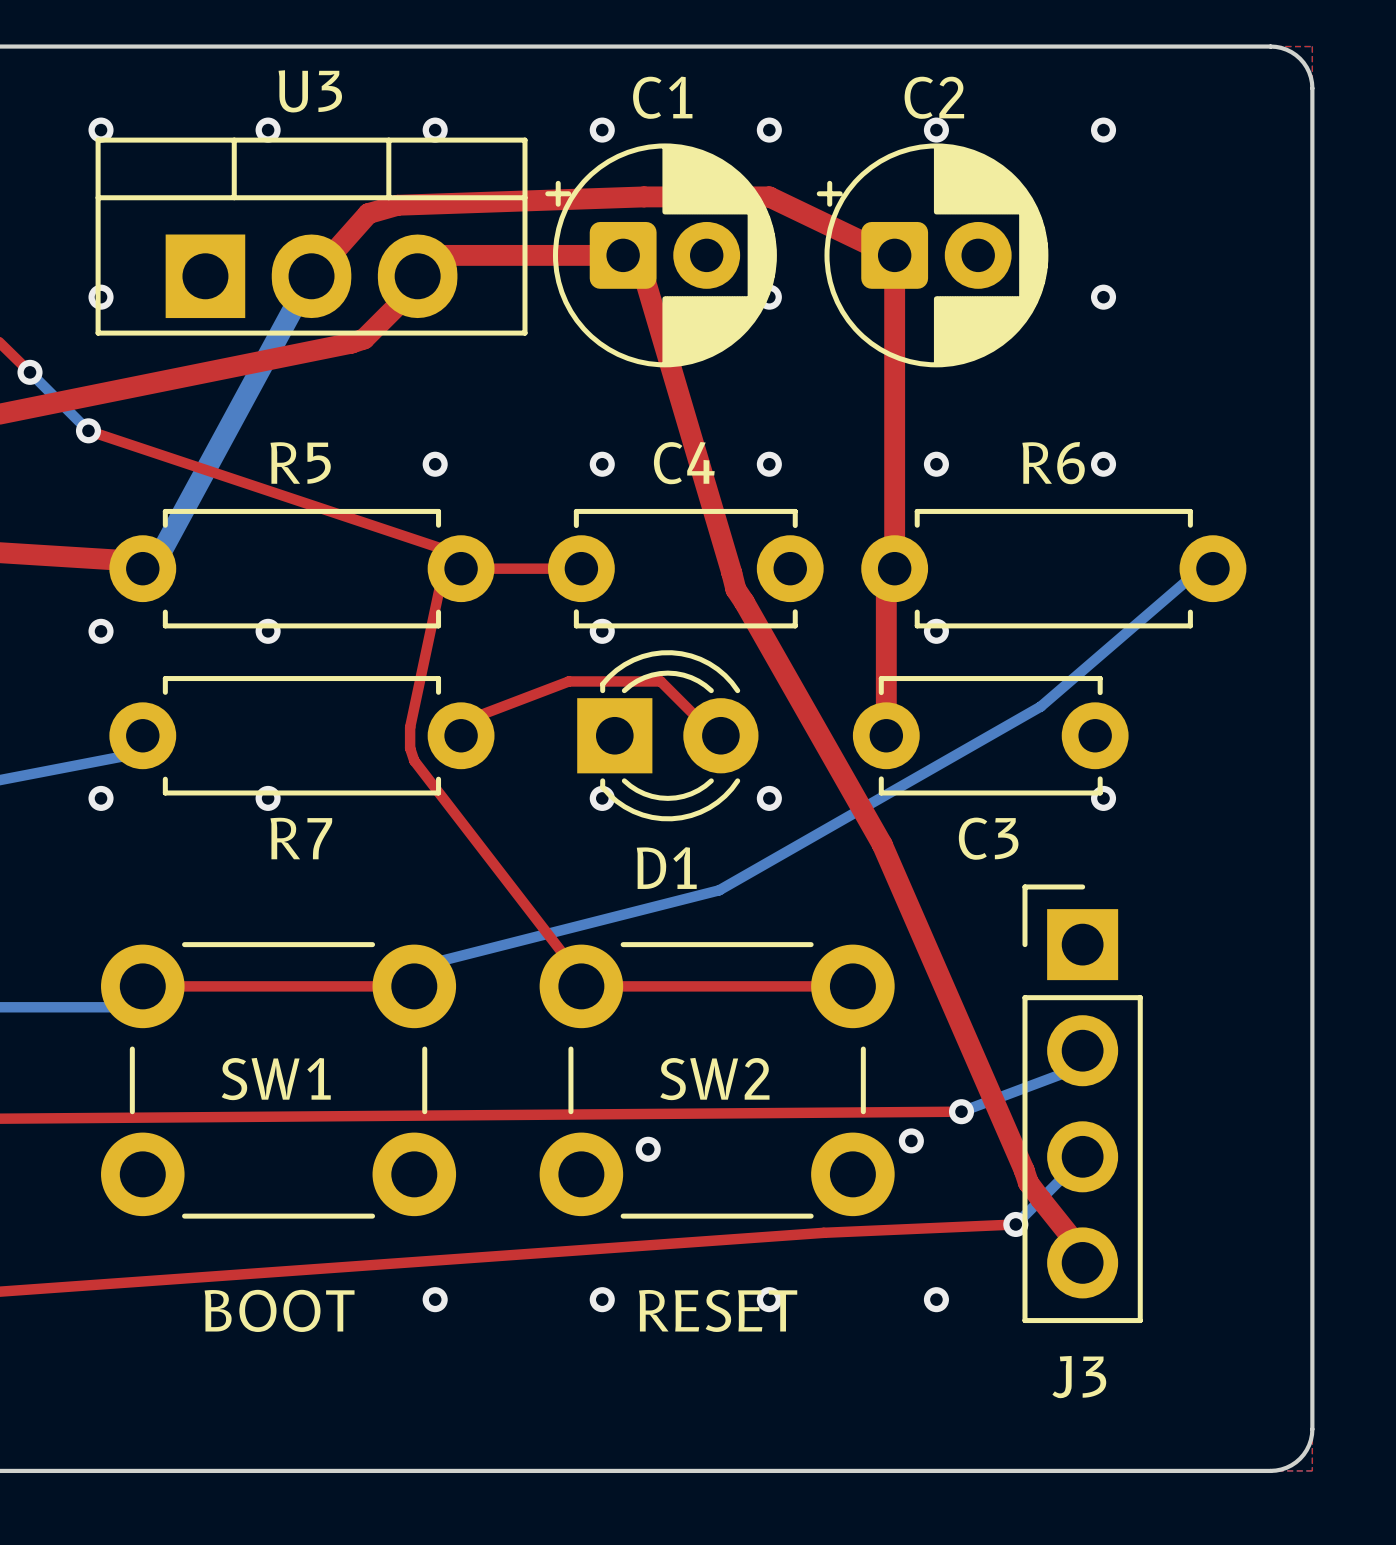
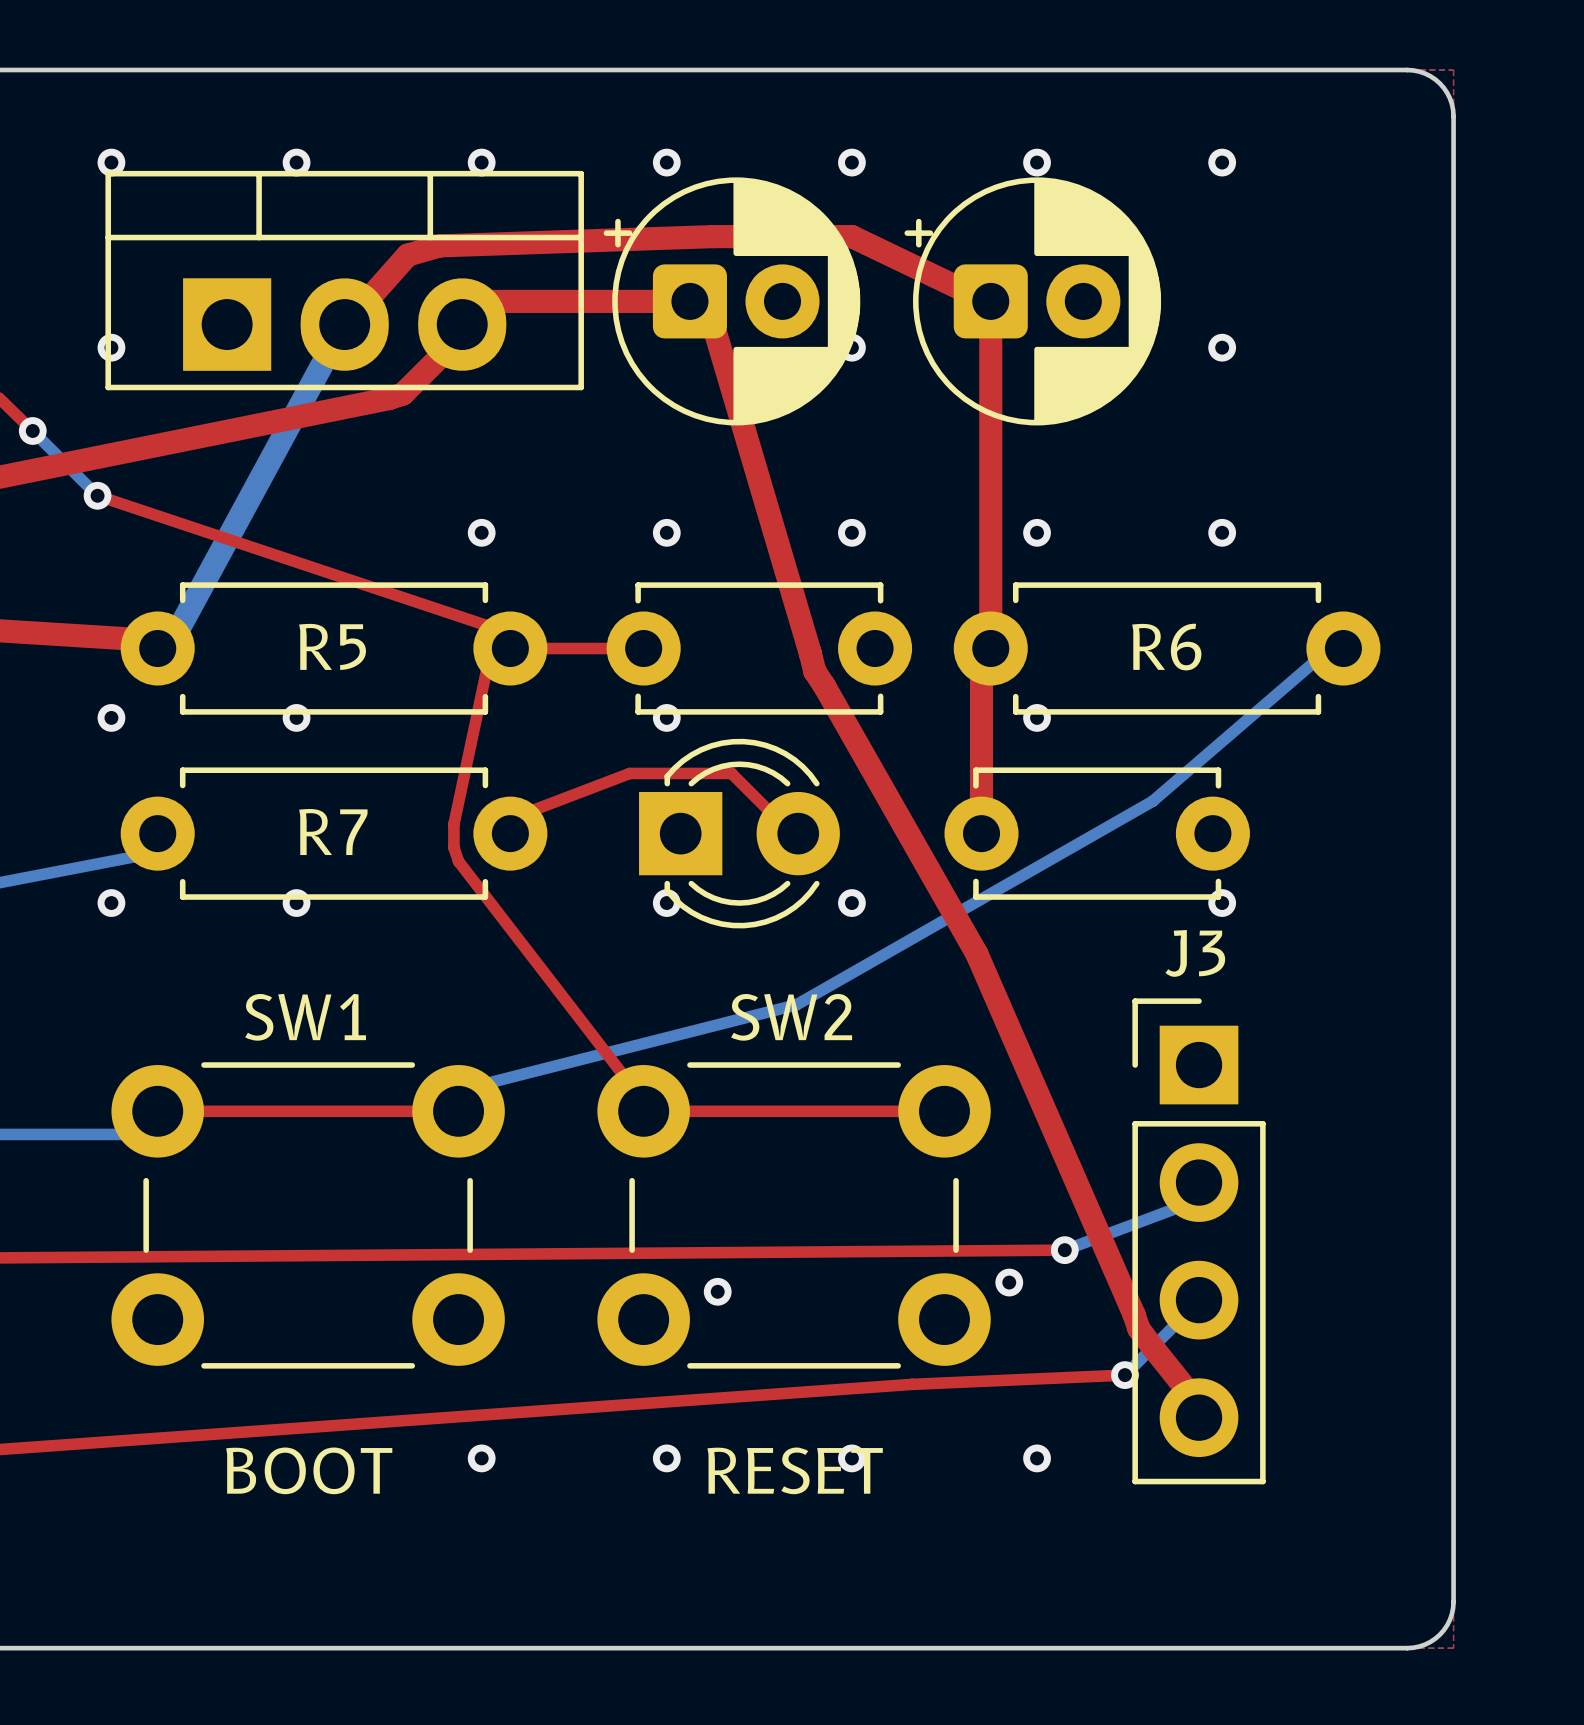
U3 name: U3 (310, 91) -> none
C1 name: C1 (662, 97) -> none
C2 name: C2 (934, 97) -> none
R5 name position: R5 (300, 463) -> R5 (332, 646)
C4 name: C4 (684, 463) -> none
R6 name position: R6 (1053, 463) -> R6 (1166, 647)
R7 name position: R7 (301, 838) -> R7 (333, 832)
C3 name: C3 (988, 838) -> none
D1 name: D1 (666, 868) -> none
SW1 name position: SW1 (276, 1079) -> SW1 (305, 1017)
SW2 name position: SW2 (714, 1079) -> SW2 (791, 1017)
J3 name position: J3 (1079, 1377) -> J3 (1195, 953)

